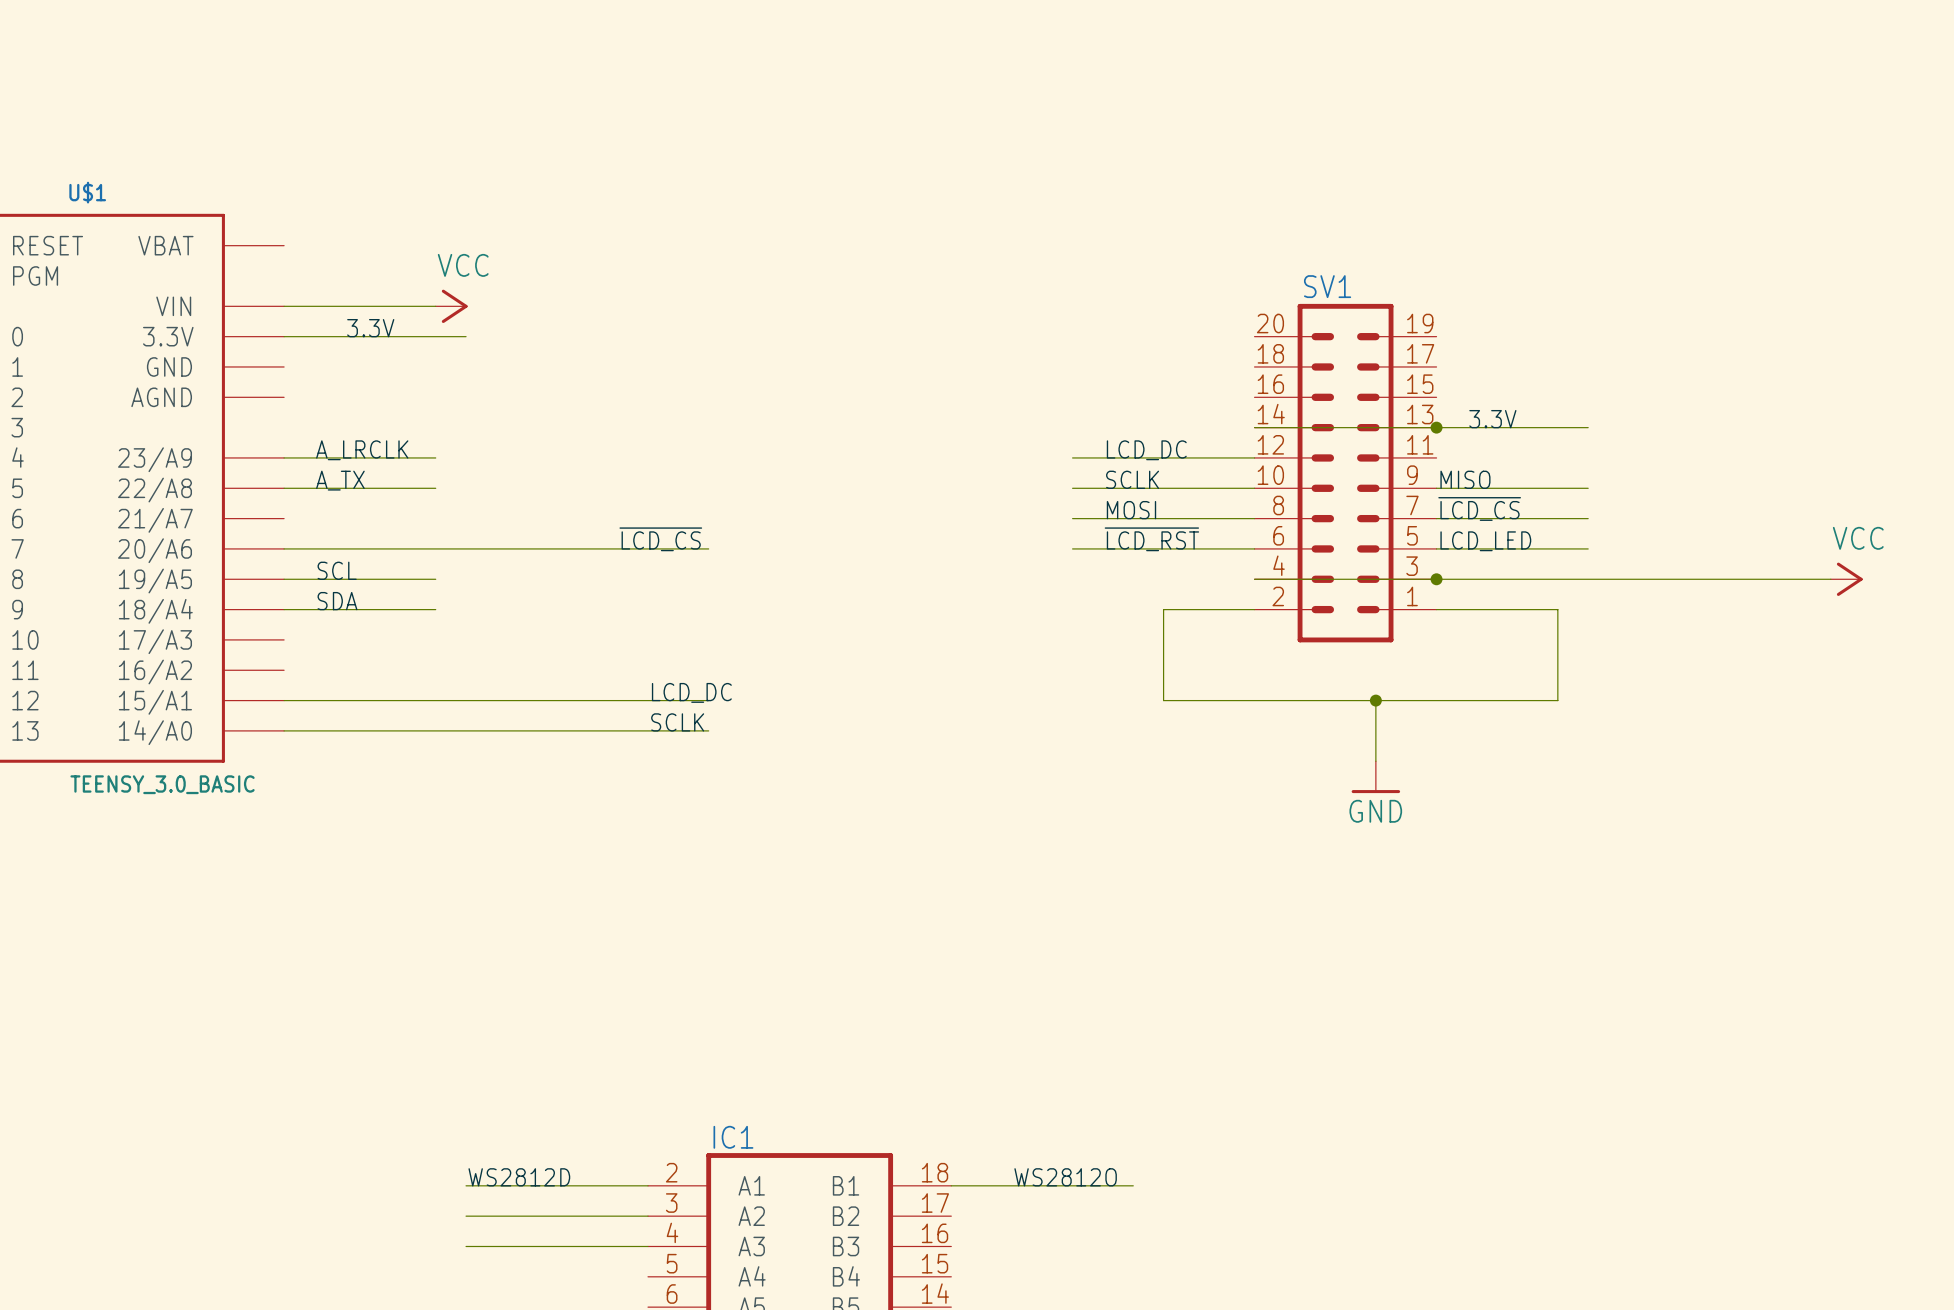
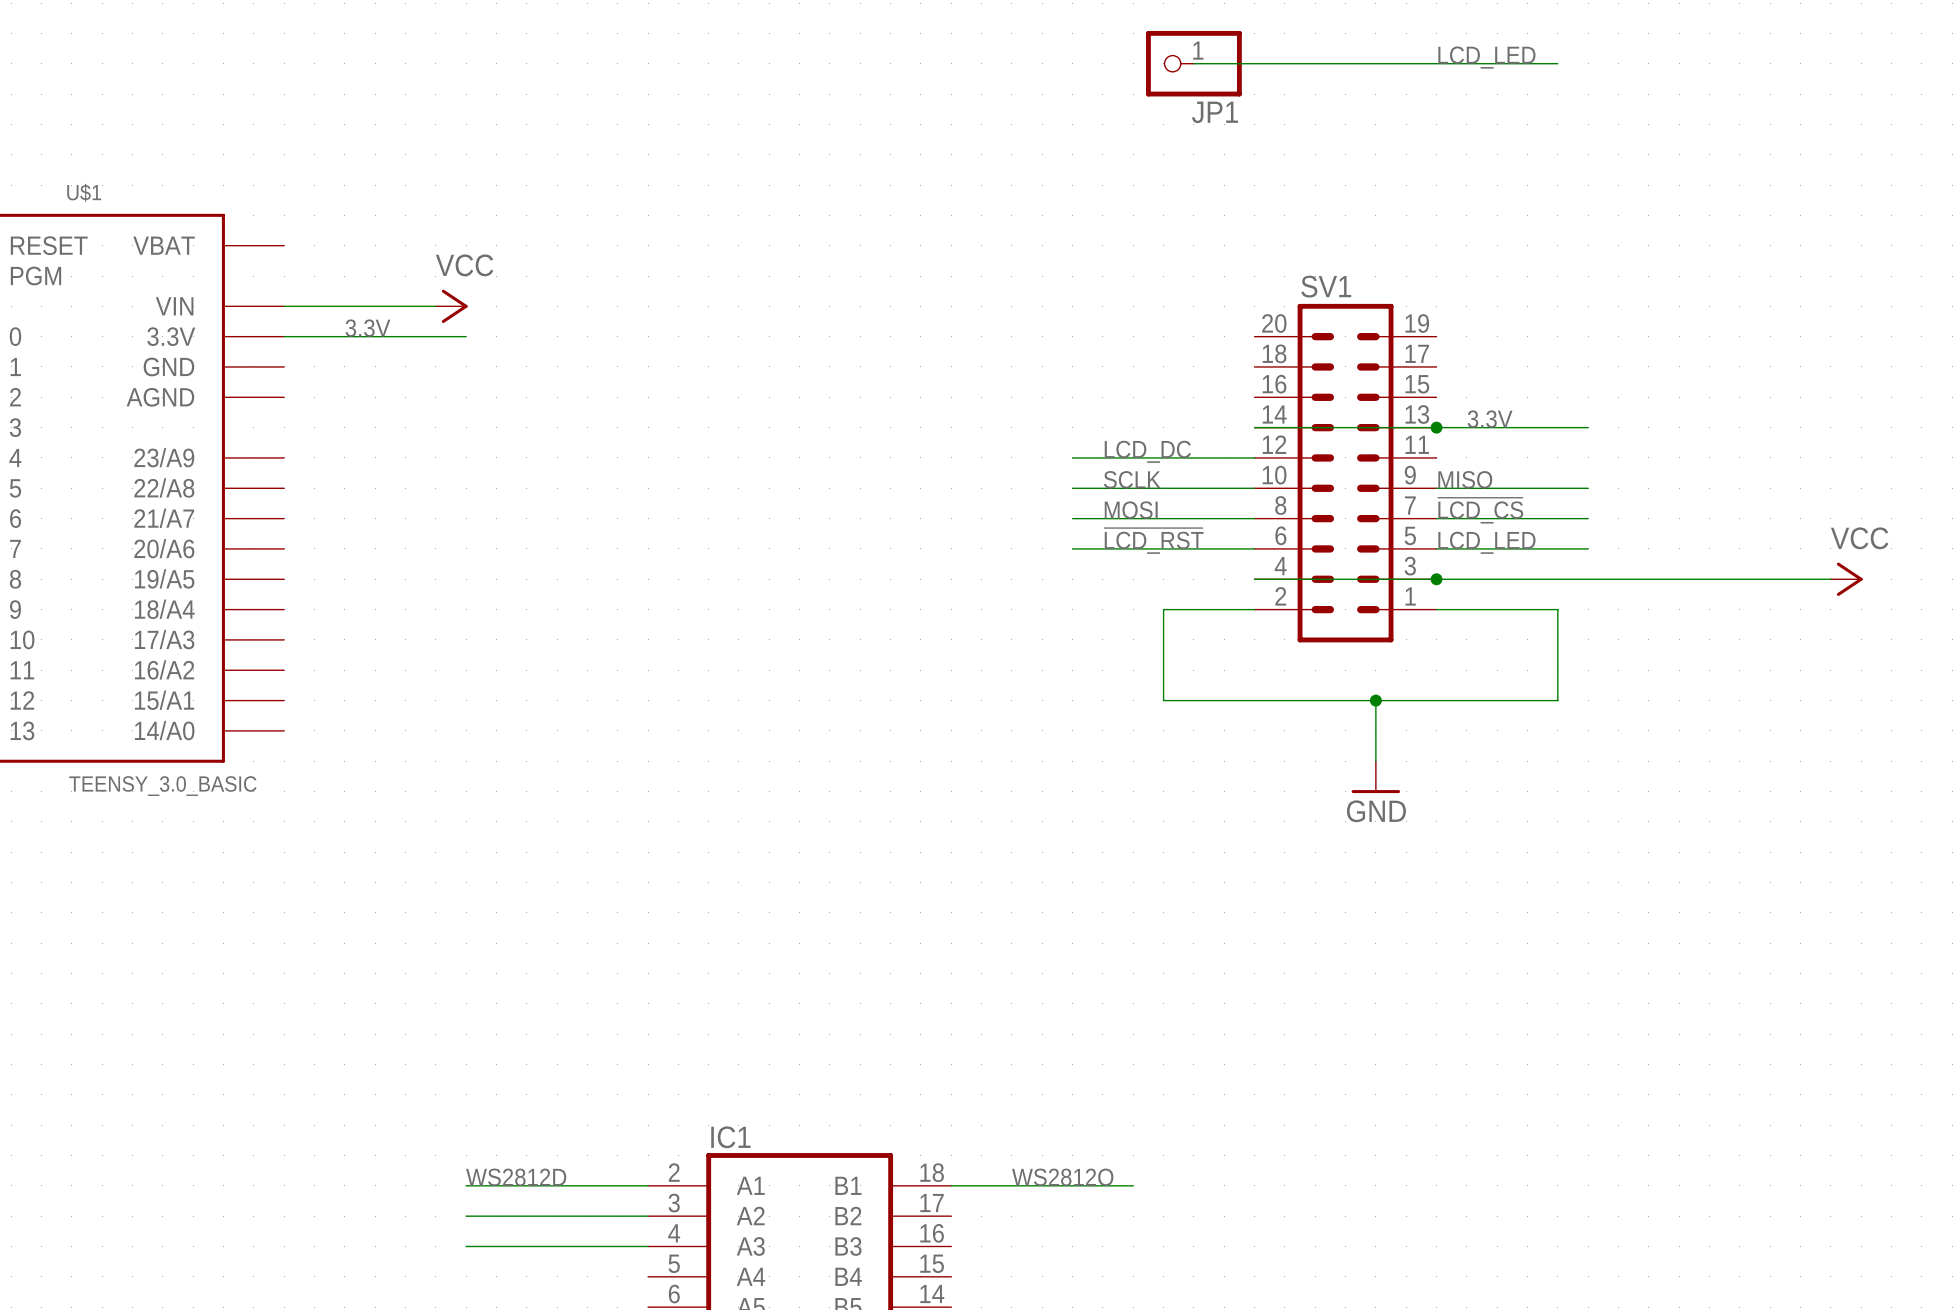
label: none -> LCD_LED (1486, 57)
wire: none -> (1193, 63) (1557, 63)
JP1: none -> (1193, 63)
label: A_LRCLK (362, 450) -> none
wire: (284, 457) (435, 457) -> none
label: A_TX (340, 480) -> none
wire: (284, 488) (435, 488) -> none
label: ~{LCD_CS} (660, 539) -> none
wire: (284, 548) (708, 548) -> none
label: SCL (337, 570) -> none
wire: (284, 579) (435, 579) -> none
label: SDA (337, 601) -> none
wire: (284, 609) (435, 609) -> none
label: LCD_DC (691, 692) -> none
wire: (284, 700) (708, 700) -> none
label: SCLK (677, 722) -> none
wire: (284, 730) (708, 730) -> none

